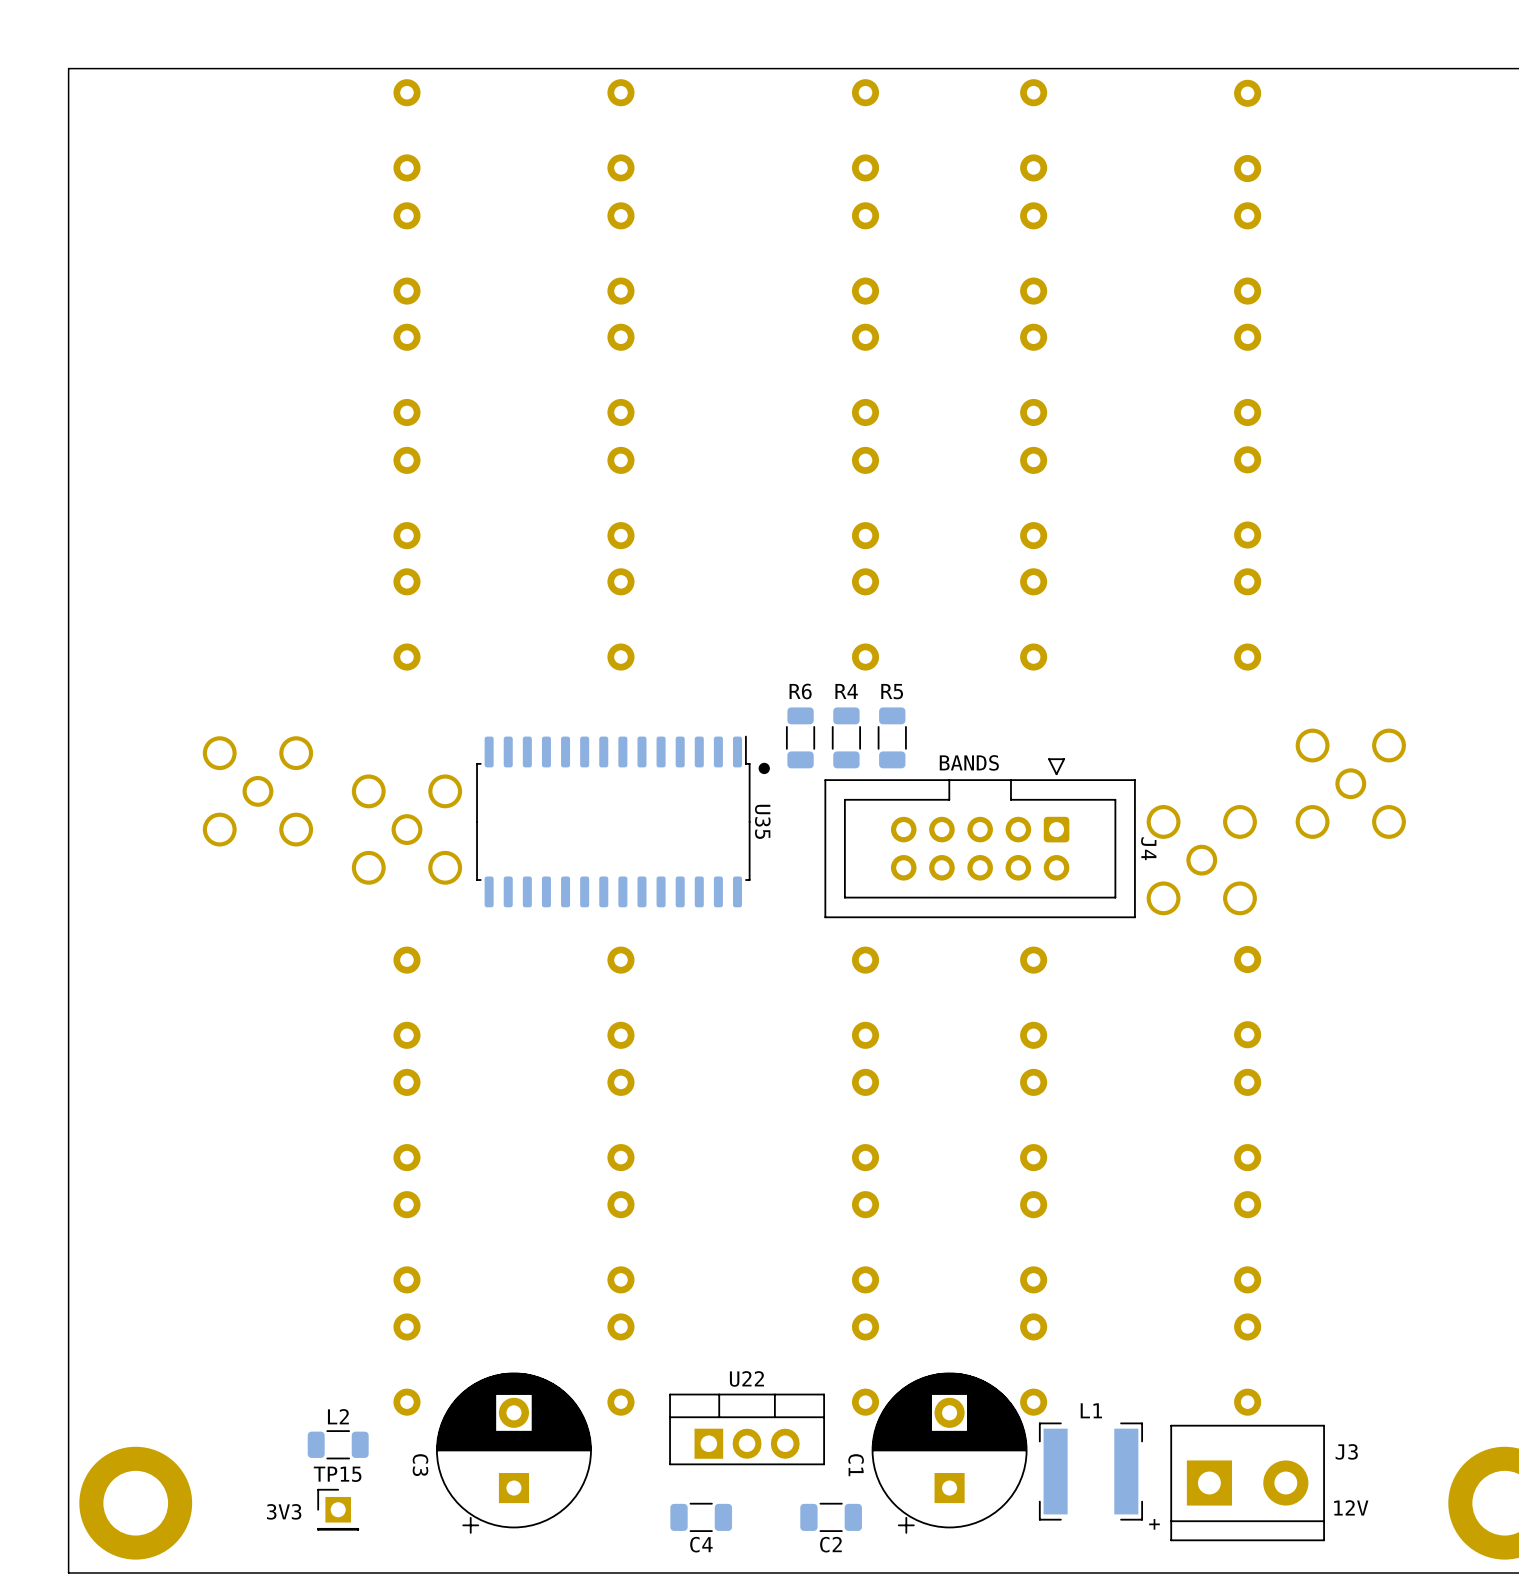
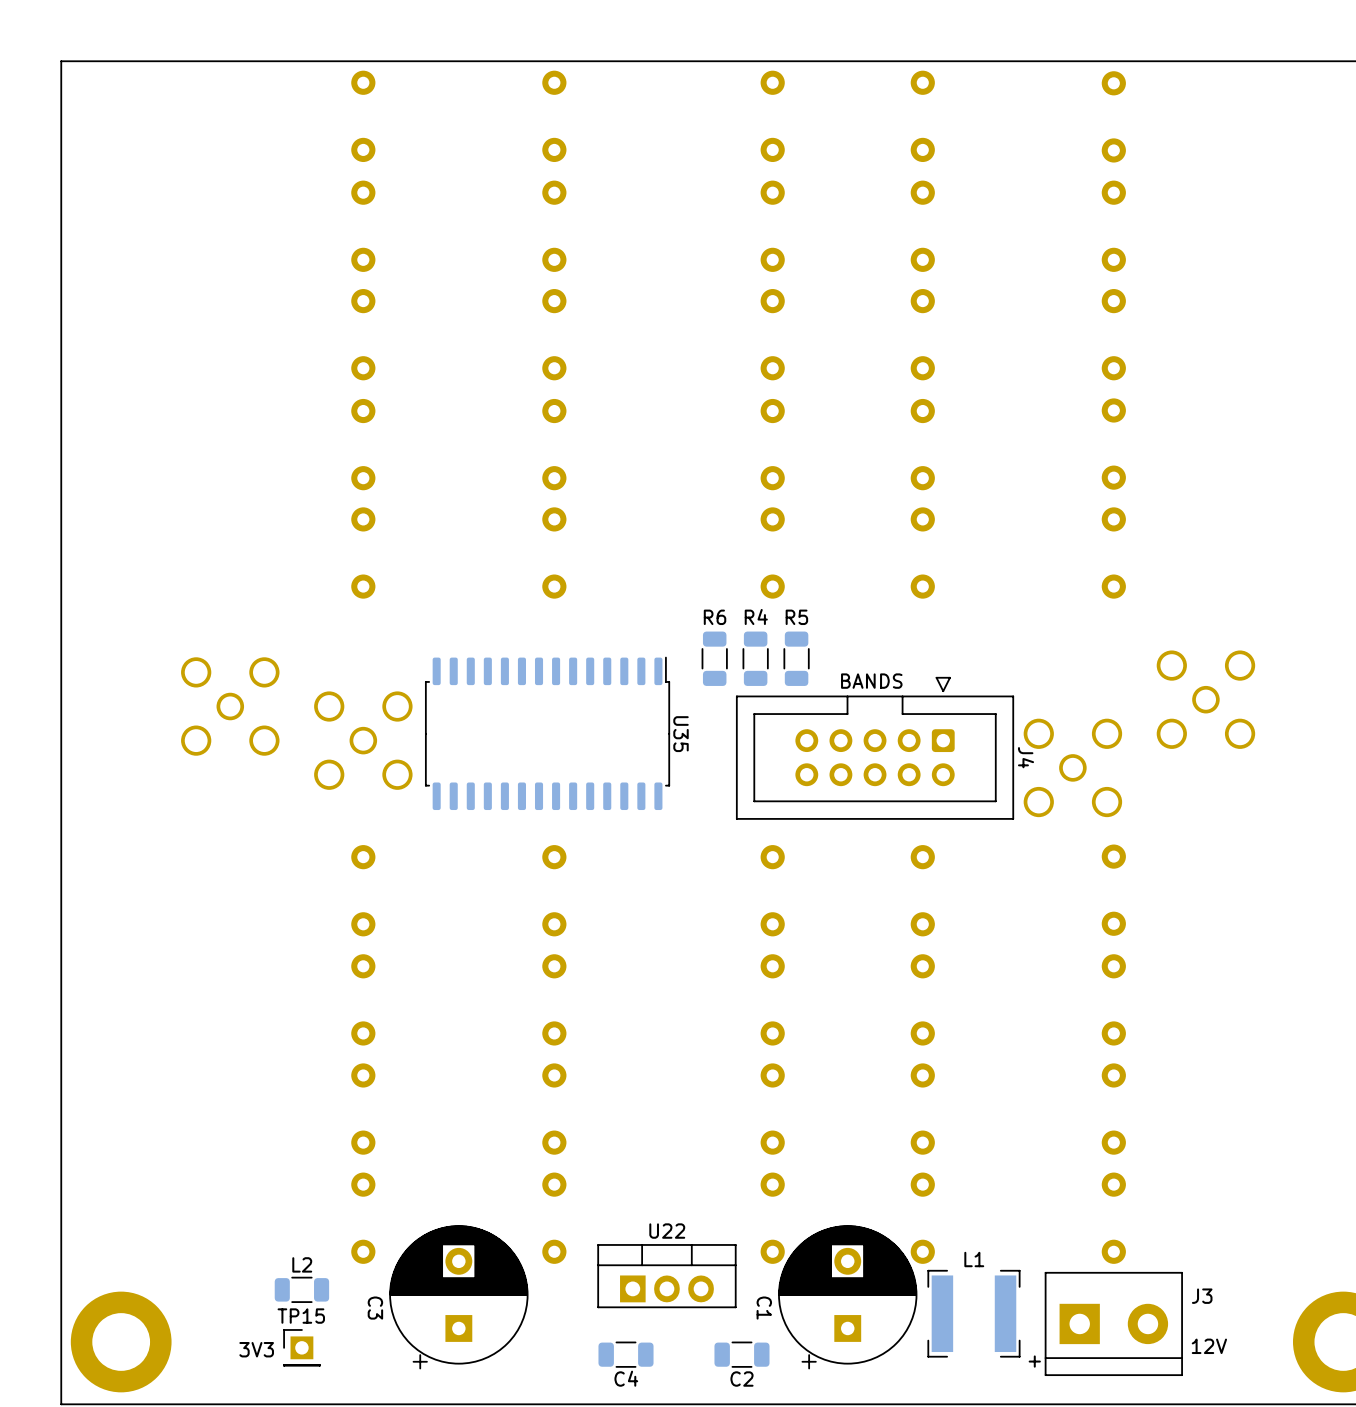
drawing: [758, 762, 770, 775] -> none

